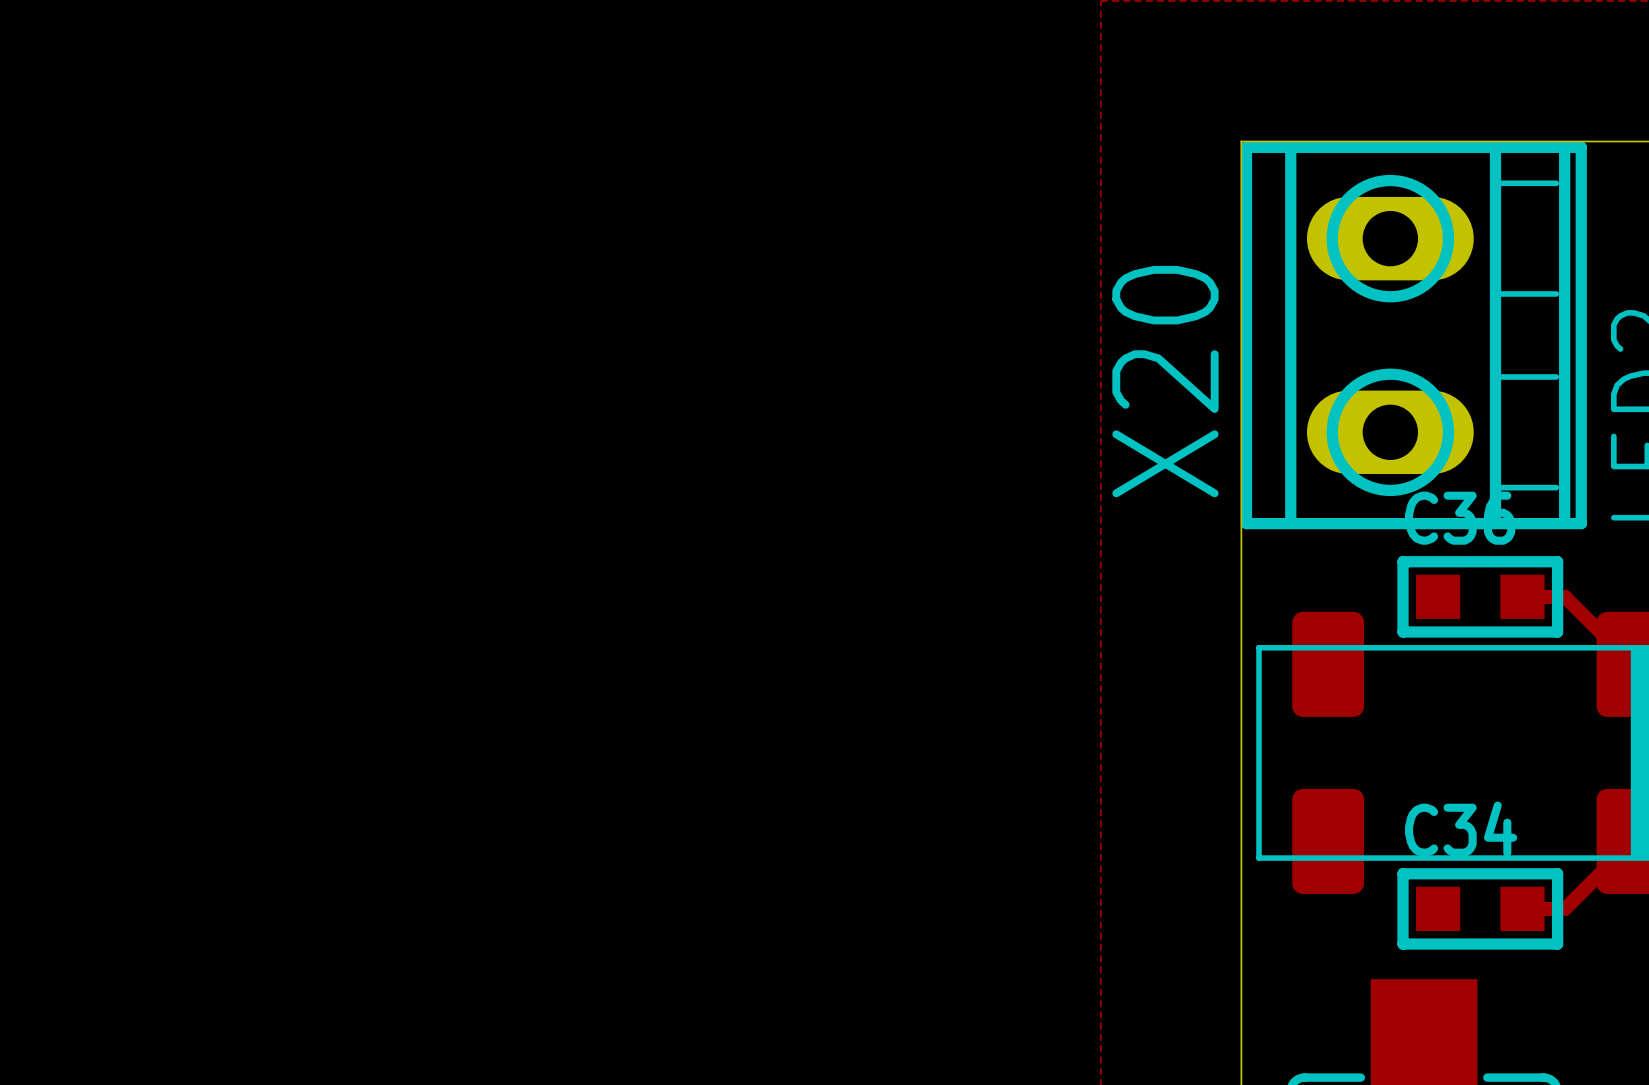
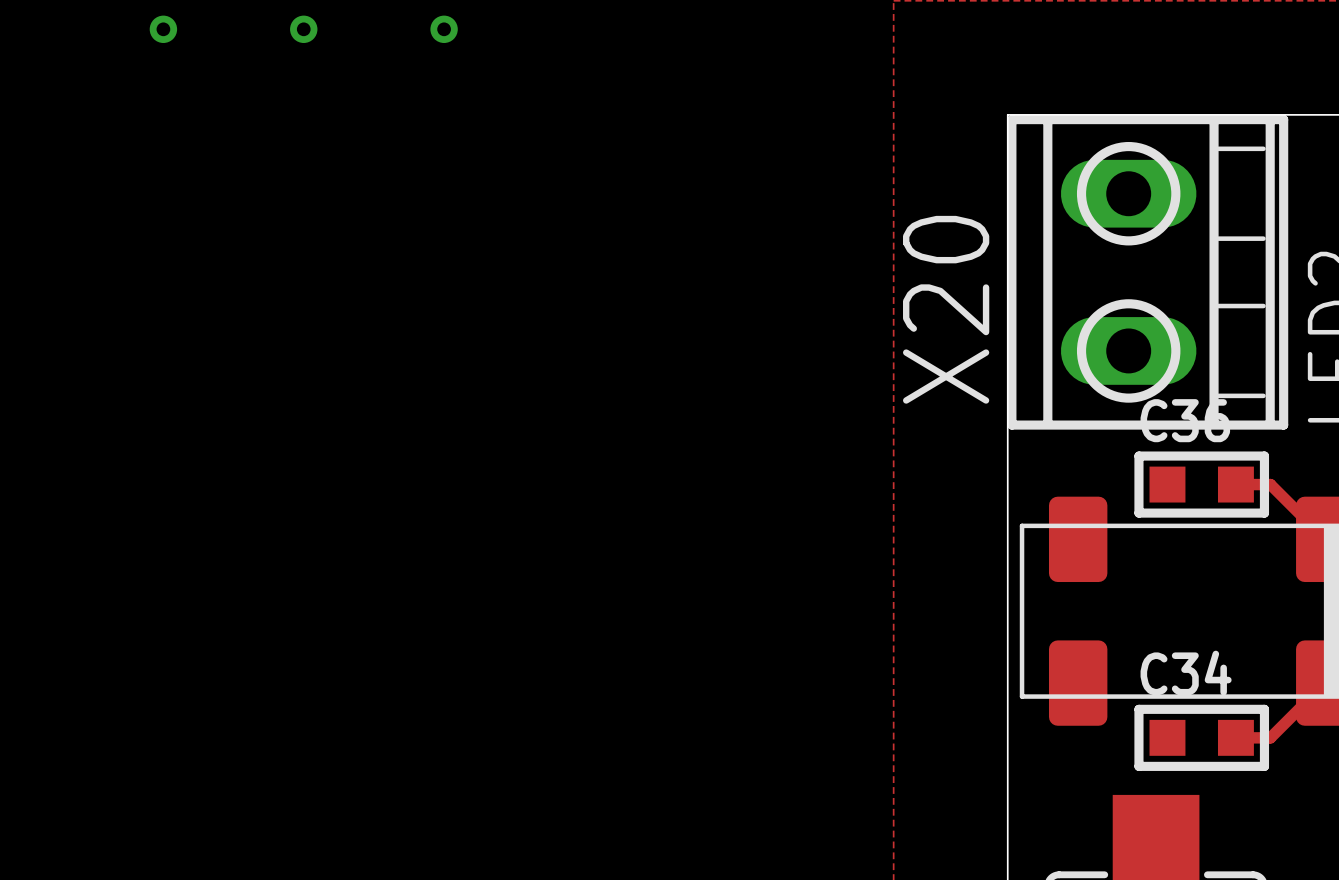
via: none -> (163, 29)
via: none -> (303, 29)
via: none -> (444, 29)

